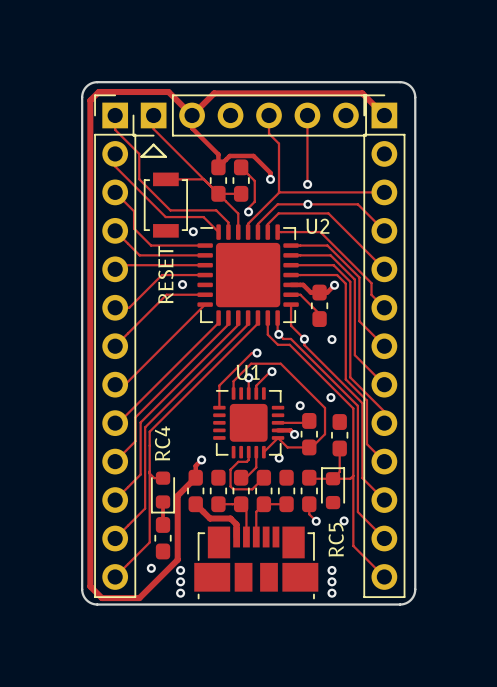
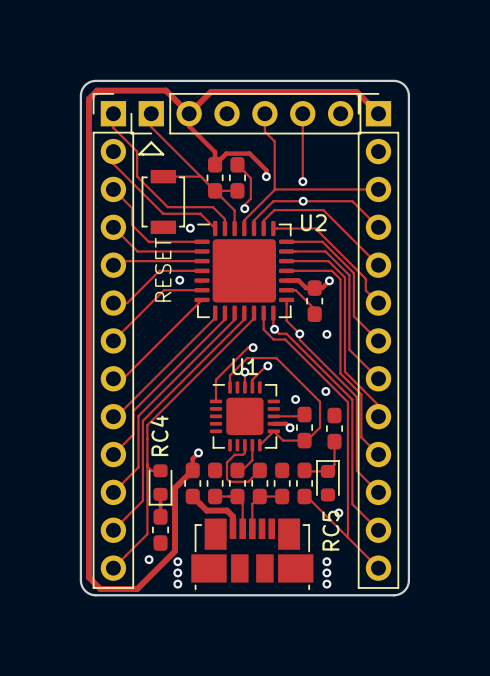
via: (279, 458) -> none
track: (353, 475) (350, 478) (333, 478) -> none
track: (309, 504) (309, 514) (316, 521) -> none
track: none -> (306, 496) (347, 537)
via: (316, 521) -> none

